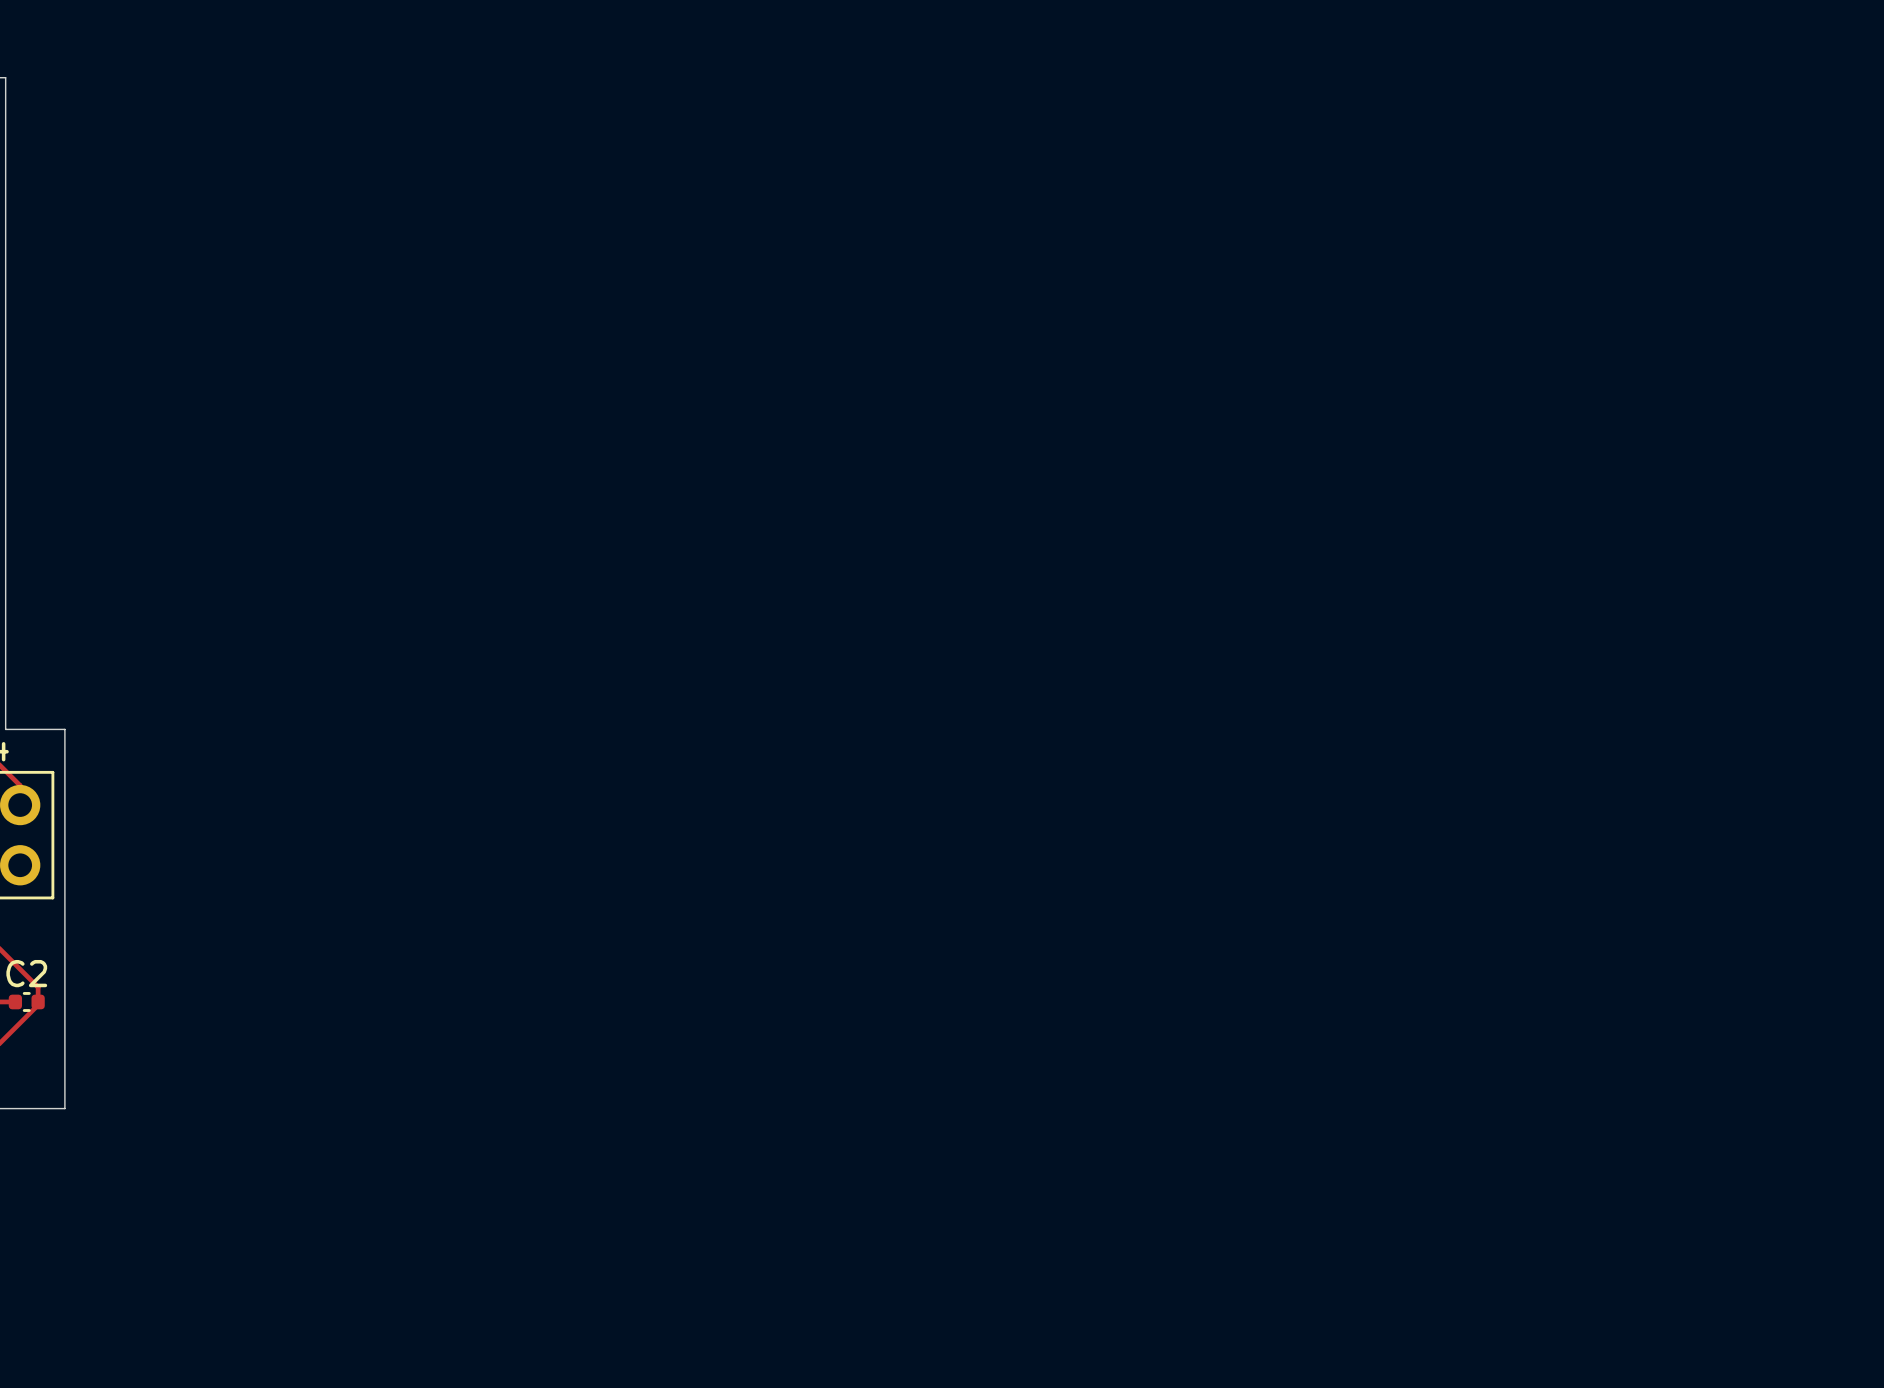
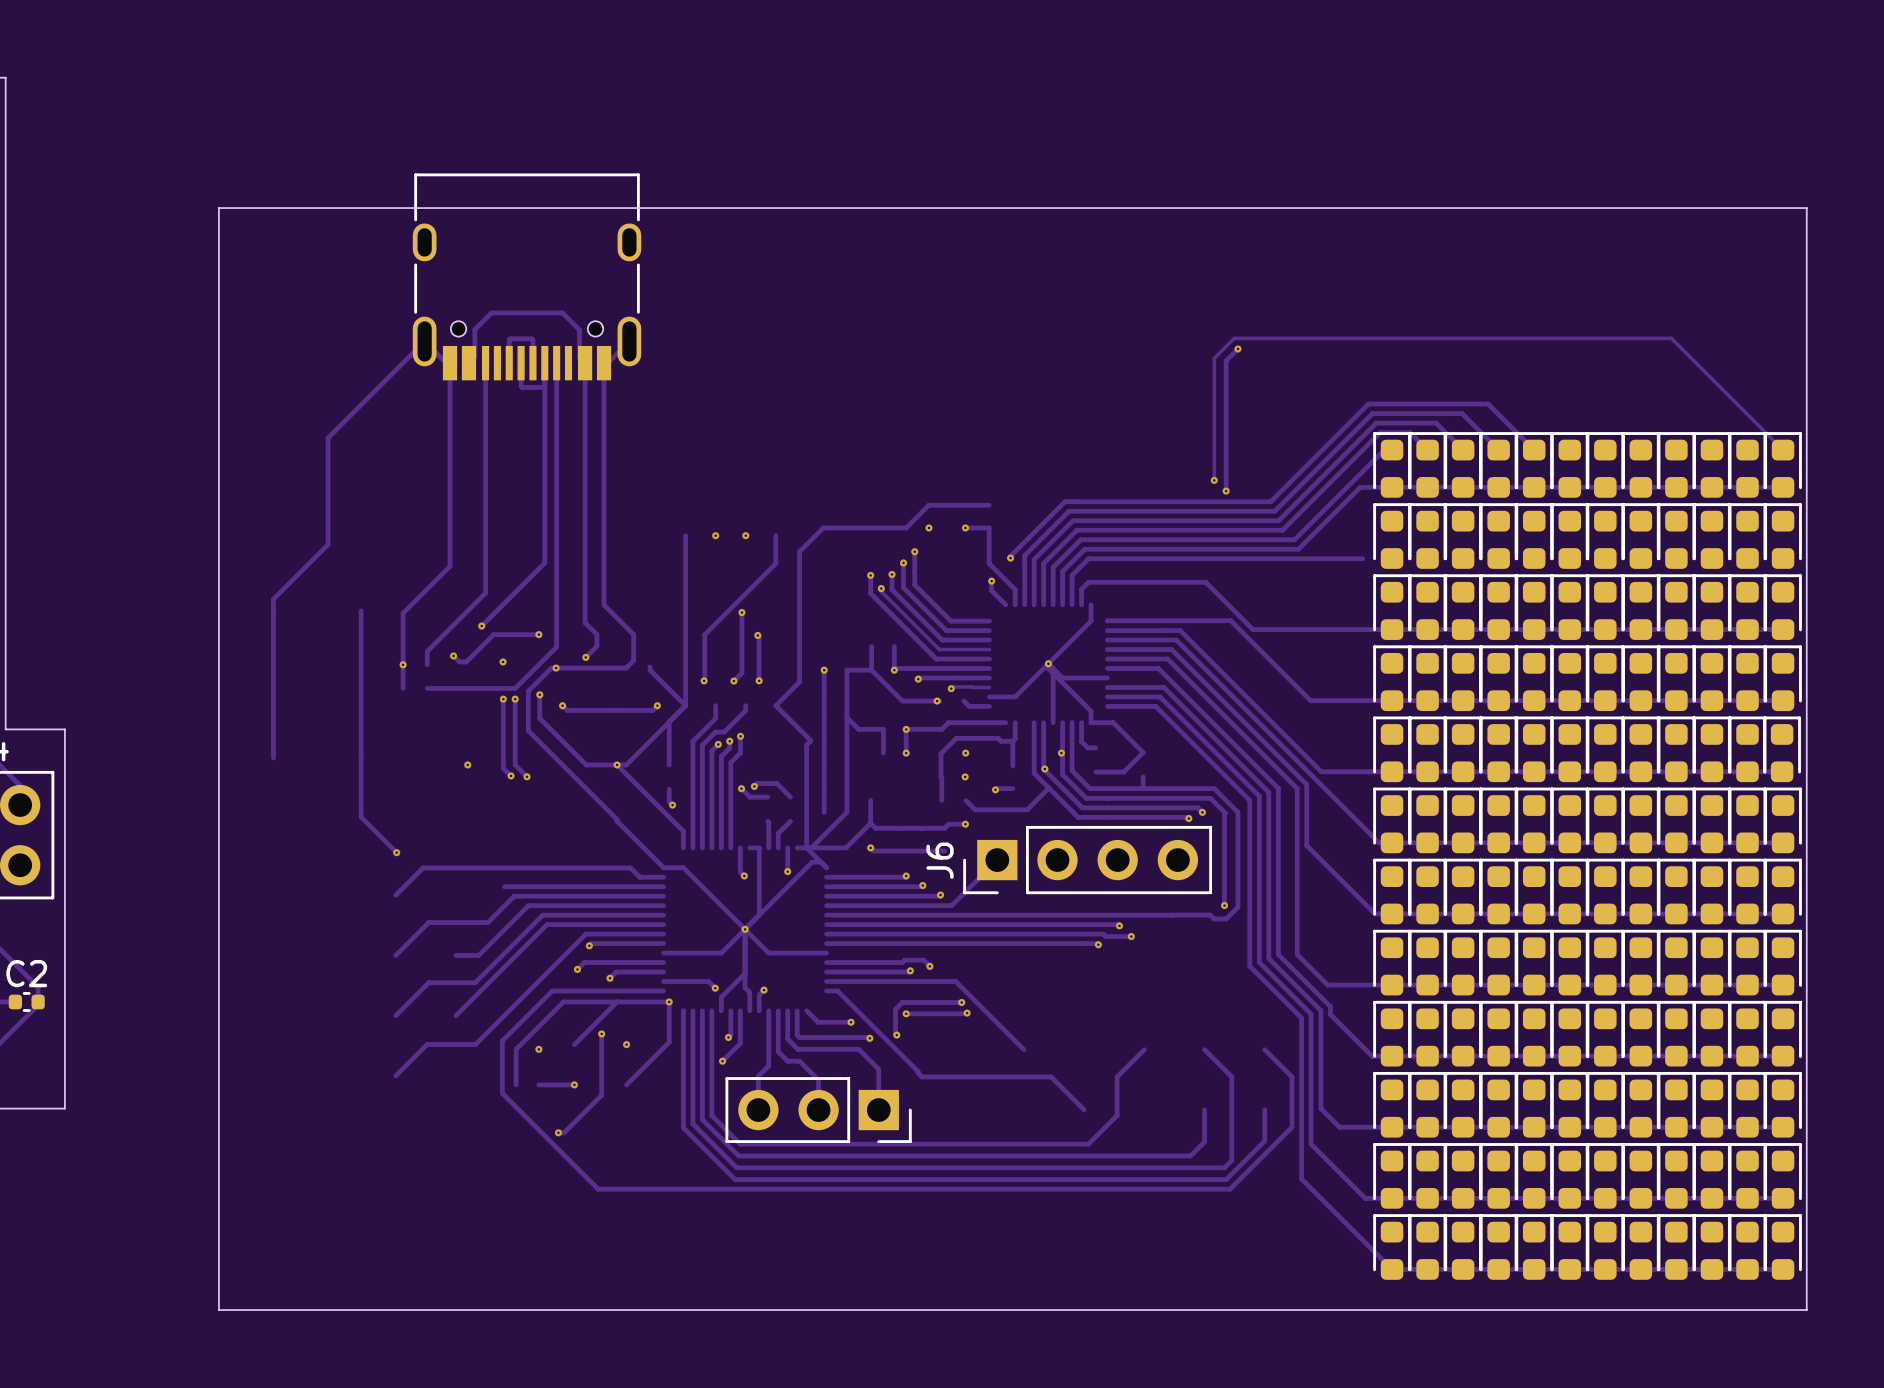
board edge: none -> (218, 208) (1806, 208) (1806, 1310) (218, 1310) (218, 208)
part: none -> (527, 276)
track: none -> (629, 341) (607, 363) (604, 363) (604, 605) (633, 634) (633, 660) (626, 668) (551, 668) (528, 691) (528, 730) (663, 867) (683, 867) (768, 953) (826, 953)
track: none -> (1237, 348) (1226, 360) (1226, 491)
via: none -> (1237, 348)
track: none -> (468, 363) (474, 357) (474, 329) (491, 312) (562, 312) (579, 329) (579, 357) (585, 363) (585, 622) (596, 634) (596, 646) (585, 657)
track: none -> (485, 363) (485, 593) (427, 651) (427, 664)
track: none -> (509, 363) (510, 338) (532, 340) (532, 363)
track: none -> (521, 363) (522, 387) (544, 386)
track: none -> (544, 363) (544, 562) (481, 626)
track: none -> (556, 363) (556, 646) (515, 688) (427, 688)
track: none -> (1392, 450) (1384, 450) (1294, 539) (1080, 539) (1053, 567) (1053, 604)
track: none -> (1427, 450) (1410, 432) (1380, 432) (1282, 530) (1076, 530) (1043, 563) (1043, 604)
track: none -> (1463, 450) (1436, 423) (1376, 423) (1278, 520) (1072, 520) (1034, 559) (1034, 604)
track: none -> (1498, 450) (1462, 413) (1372, 413) (1274, 511) (1069, 511) (1024, 555) (1024, 604)
track: none -> (1534, 450) (1488, 404) (1368, 404) (1270, 501) (1065, 501) (1010, 558)
track: none -> (1783, 450) (1671, 338) (1234, 338) (1214, 358) (1214, 480)
part: none -> (1392, 464)
part: none -> (1427, 464)
part: none -> (1463, 464)
part: none -> (1498, 464)
part: none -> (1534, 464)
part: none -> (1569, 464)
part: none -> (1605, 464)
part: none -> (1640, 464)
part: none -> (1676, 464)
part: none -> (1711, 464)
part: none -> (1747, 464)
part: none -> (1783, 464)
via: none -> (1214, 480)
track: none -> (1783, 487) (1360, 487) (1298, 549) (1084, 549) (1062, 571) (1062, 604)
via: none -> (1226, 491)
track: none -> (989, 505) (928, 505) (906, 527) (823, 527) (799, 551) (799, 682) (775, 705) (810, 740) (806, 745) (806, 847) (826, 867)
via: none -> (928, 527)
track: none -> (965, 527) (989, 527) (989, 563) (1015, 589) (1015, 604)
via: none -> (965, 527)
track: none -> (685, 535) (685, 705)
via: none -> (715, 535)
via: none -> (745, 535)
track: none -> (775, 535) (775, 563) (704, 634) (704, 680)
part: none -> (1392, 536)
part: none -> (1427, 536)
part: none -> (1463, 536)
part: none -> (1498, 536)
part: none -> (1534, 536)
part: none -> (1569, 536)
part: none -> (1605, 536)
part: none -> (1640, 536)
part: none -> (1676, 536)
part: none -> (1711, 536)
part: none -> (1747, 536)
part: none -> (1783, 536)
track: none -> (914, 551) (914, 584) (950, 621) (989, 621)
via: none -> (914, 551)
via: none -> (1010, 558)
track: none -> (1362, 558) (1088, 558) (1072, 575) (1072, 604)
track: none -> (903, 562) (903, 587) (946, 630) (989, 630)
via: none -> (903, 562)
track: none -> (892, 574) (892, 589) (942, 640) (989, 640)
via: none -> (892, 574)
track: none -> (870, 575) (870, 593) (936, 659) (989, 659)
via: none -> (870, 575)
track: none -> (991, 581) (991, 590) (1005, 604)
via: none -> (991, 581)
track: none -> (881, 588) (881, 591) (939, 649) (989, 649)
via: none -> (881, 588)
track: none -> (1081, 604) (1081, 589) (1088, 582) (1205, 582) (1253, 629) (1783, 629)
track: none -> (1091, 604) (1091, 621) (1015, 696) (989, 696)
part: none -> (1392, 607)
part: none -> (1427, 607)
part: none -> (1463, 607)
part: none -> (1498, 607)
part: none -> (1534, 607)
part: none -> (1569, 607)
part: none -> (1605, 607)
part: none -> (1640, 607)
part: none -> (1676, 607)
part: none -> (1711, 607)
part: none -> (1747, 607)
part: none -> (1783, 607)
track: none -> (361, 610) (361, 817) (396, 852)
track: none -> (741, 612) (741, 673) (733, 681)
via: none -> (741, 612)
track: none -> (1107, 621) (1230, 620) (1310, 700) (1783, 700)
via: none -> (481, 626)
track: none -> (1107, 630) (1180, 630) (1321, 771) (1782, 771)
track: none -> (538, 634) (493, 634) (466, 661) (459, 661) (453, 655)
via: none -> (538, 634)
track: none -> (757, 635) (759, 680)
via: none -> (757, 635)
track: none -> (1107, 640) (1176, 640) (1379, 842) (1783, 842)
track: none -> (871, 646) (871, 670)
track: none -> (894, 646) (894, 670) (896, 668) (989, 668)
track: none -> (1107, 649) (1171, 649) (1306, 784) (1306, 845) (1375, 913) (1783, 913)
via: none -> (453, 655)
via: none -> (585, 657)
track: none -> (1107, 659) (1167, 659) (1297, 788) (1297, 954) (1327, 985) (1783, 985)
via: none -> (503, 661)
via: none -> (1048, 663)
via: none -> (403, 664)
track: none -> (650, 666) (650, 670) (685, 705)
via: none -> (556, 668)
track: none -> (1053, 668) (1053, 722)
track: none -> (1107, 668) (1158, 668) (1278, 788) (1278, 954) (1330, 1006) (1330, 1014) (1372, 1056) (1783, 1056)
track: none -> (824, 670) (824, 812)
via: none -> (824, 670)
track: none -> (871, 670) (846, 670) (846, 812) (811, 847)
track: none -> (871, 670) (902, 701) (939, 701)
via: none -> (894, 670)
track: none -> (918, 677) (989, 677)
track: none -> (1107, 677) (1062, 677) (1048, 663) (1048, 668) (1091, 711) (1091, 722) (1113, 722) (1143, 752) (1123, 772) (1095, 772)
part: none -> (1392, 678)
part: none -> (1427, 678)
part: none -> (1463, 678)
part: none -> (1498, 678)
part: none -> (1534, 678)
part: none -> (1569, 678)
part: none -> (1605, 678)
part: none -> (1640, 678)
part: none -> (1676, 678)
part: none -> (1711, 678)
part: none -> (1747, 678)
part: none -> (1783, 678)
via: none -> (918, 679)
via: none -> (704, 680)
via: none -> (759, 680)
via: none -> (733, 681)
track: none -> (989, 687) (952, 686) (951, 688)
track: none -> (1107, 687) (1163, 687) (1268, 792) (1268, 958) (1320, 1010) (1320, 1108) (1339, 1127) (1783, 1127)
track: none -> (403, 688) (403, 613) (450, 566) (450, 363) (446, 363) (424, 341) (328, 438) (328, 544) (273, 599) (273, 757)
via: none -> (951, 688)
track: none -> (539, 694) (539, 718) (586, 764) (626, 764) (685, 705)
via: none -> (539, 694)
track: none -> (1107, 696) (1160, 696) (1259, 796) (1259, 962) (1311, 1014) (1311, 1144) (1365, 1198) (1783, 1198)
track: none -> (503, 699) (503, 768) (511, 775)
via: none -> (503, 699)
track: none -> (515, 699) (515, 764) (527, 776)
via: none -> (515, 699)
via: none -> (937, 701)
track: none -> (963, 701) (969, 706) (989, 706)
track: none -> (562, 705) (567, 710) (652, 710) (657, 705)
via: none -> (562, 705)
via: none -> (657, 705)
track: none -> (715, 705) (715, 718) (692, 741) (692, 847)
track: none -> (745, 705) (745, 710) (724, 732) (715, 732) (702, 745) (702, 847)
track: none -> (1107, 706) (1155, 706) (1249, 800) (1249, 966) (1301, 1018) (1301, 1178) (1392, 1269) (1783, 1269)
track: none -> (846, 717) (858, 729) (883, 729) (883, 753)
track: none -> (669, 722) (669, 764)
track: none -> (1005, 722) (948, 722) (941, 729) (906, 729) (906, 753)
track: none -> (1015, 722) (1015, 738) (1012, 741)
track: none -> (1034, 722) (1034, 773) (1078, 817) (1188, 818)
track: none -> (1043, 722) (1043, 769)
track: none -> (1062, 722) (1062, 774) (1086, 798) (1210, 798) (1225, 813) (1224, 905)
track: none -> (1072, 722) (1072, 770) (1090, 788) (1214, 788) (1237, 812) (1237, 907) (1226, 919) (1214, 919) (1210, 915) (1173, 915)
track: none -> (1081, 722) (1081, 741) (1087, 747) (1095, 747)
via: none -> (906, 729)
track: none -> (740, 736) (740, 752) (730, 762) (730, 847)
via: none -> (740, 736)
track: none -> (729, 741) (729, 748) (721, 756) (721, 847)
via: none -> (729, 741)
track: none -> (1012, 741) (1001, 741) (998, 738) (956, 738) (941, 753) (941, 800)
track: none -> (1012, 741) (1012, 765)
track: none -> (718, 744) (711, 750) (711, 847)
via: none -> (718, 744)
part: none -> (1392, 749)
part: none -> (1427, 749)
part: none -> (1463, 749)
part: none -> (1498, 749)
part: none -> (1534, 749)
part: none -> (1569, 749)
part: none -> (1605, 749)
part: none -> (1640, 749)
part: none -> (1676, 749)
part: none -> (1711, 749)
part: none -> (1747, 749)
part: none -> (1782, 749)
via: none -> (906, 753)
via: none -> (965, 753)
via: none -> (1061, 753)
via: none -> (467, 764)
track: none -> (617, 764) (683, 831) (683, 847)
via: none -> (617, 764)
track: none -> (1043, 769) (1082, 807) (1197, 807) (1202, 812)
via: none -> (1044, 769)
via: none -> (511, 775)
via: none -> (527, 776)
via: none -> (965, 776)
track: none -> (1143, 776) (1143, 788)
track: none -> (754, 786) (757, 783) (776, 783) (790, 797)
via: none -> (754, 786)
track: none -> (741, 788) (749, 797) (767, 797)
via: none -> (741, 788)
track: none -> (1012, 788) (995, 789)
track: none -> (1048, 788) (1027, 809) (975, 809) (965, 800)
track: none -> (669, 789) (669, 801) (672, 805)
via: none -> (995, 789)
track: none -> (870, 800) (870, 823)
via: none -> (672, 805)
via: none -> (1202, 812)
via: none -> (1188, 818)
part: none -> (1392, 820)
part: none -> (1427, 820)
part: none -> (1463, 820)
part: none -> (1498, 820)
part: none -> (1534, 820)
part: none -> (1569, 820)
part: none -> (1605, 820)
part: none -> (1640, 820)
part: none -> (1676, 820)
part: none -> (1711, 820)
part: none -> (1747, 820)
part: none -> (1783, 820)
track: none -> (767, 821) (768, 847)
track: none -> (790, 821) (778, 833) (778, 847)
track: none -> (870, 823) (875, 828) (944, 828) (948, 824) (965, 824)
track: none -> (870, 823) (846, 847) (797, 847)
via: none -> (965, 824)
track: none -> (740, 847) (740, 871) (744, 875)
track: none -> (749, 847) (759, 847) (759, 915)
track: none -> (787, 847) (787, 871)
track: none -> (870, 847) (873, 851) (944, 851)
via: none -> (870, 847)
via: none -> (396, 852)
track: none -> (997, 860) (951, 905) (826, 905)
J6: none -> (1087, 860)
track: none -> (820, 862) (812, 862) (721, 953) (663, 953)
via: none -> (787, 871)
via: none -> (744, 875)
track: none -> (906, 876) (826, 877)
via: none -> (906, 876)
track: none -> (663, 877) (639, 877) (630, 868) (423, 868) (395, 895)
track: none -> (922, 885) (826, 886)
via: none -> (922, 885)
track: none -> (504, 886) (663, 886)
part: none -> (1392, 891)
part: none -> (1427, 891)
part: none -> (1463, 891)
part: none -> (1498, 891)
part: none -> (1534, 891)
part: none -> (1569, 891)
part: none -> (1605, 891)
part: none -> (1640, 891)
part: none -> (1676, 891)
part: none -> (1711, 891)
part: none -> (1747, 891)
part: none -> (1783, 891)
track: none -> (940, 895) (826, 896)
via: none -> (940, 895)
track: none -> (663, 896) (514, 896) (487, 922) (428, 922) (395, 955)
track: none -> (663, 905) (528, 905) (478, 955) (455, 955)
via: none -> (1224, 905)
track: none -> (663, 915) (542, 915) (475, 982) (428, 982) (395, 1015)
track: none -> (826, 915) (1172, 915)
track: none -> (663, 924) (547, 924) (455, 1015)
track: none -> (826, 924) (1119, 925)
via: none -> (1119, 925)
track: none -> (745, 929) (745, 987) (749, 992) (749, 1010)
via: none -> (745, 929)
track: none -> (663, 934) (585, 934) (475, 1044) (427, 1044) (395, 1075)
track: none -> (826, 934) (1103, 934) (1105, 936) (1131, 936)
via: none -> (1131, 936)
track: none -> (663, 943) (591, 943) (589, 945)
track: none -> (826, 943) (1098, 944)
via: none -> (1098, 944)
via: none -> (589, 945)
track: none -> (663, 962) (584, 962) (577, 969)
track: none -> (826, 962) (902, 962) (904, 960) (923, 960) (929, 966)
part: none -> (1392, 962)
part: none -> (1427, 962)
part: none -> (1463, 962)
part: none -> (1498, 962)
part: none -> (1534, 962)
part: none -> (1569, 962)
part: none -> (1605, 962)
part: none -> (1640, 962)
part: none -> (1676, 962)
part: none -> (1711, 962)
part: none -> (1747, 962)
part: none -> (1783, 962)
via: none -> (929, 966)
via: none -> (577, 969)
track: none -> (910, 970) (826, 972)
via: none -> (910, 970)
track: none -> (663, 972) (616, 972) (609, 978)
track: none -> (745, 973) (721, 997) (721, 1010)
via: none -> (609, 978)
track: none -> (663, 981) (708, 981) (715, 988)
track: none -> (826, 981) (955, 981) (1023, 1049)
via: none -> (715, 988)
track: none -> (663, 990) (552, 990) (502, 1040) (502, 1093) (598, 1189) (1230, 1189) (1292, 1127) (1292, 1076) (1264, 1049)
track: none -> (764, 990) (759, 994) (759, 1010)
via: none -> (764, 990)
track: none -> (826, 990) (837, 990) (921, 1076) (1051, 1076) (1084, 1109)
track: none -> (617, 1001) (574, 1044)
via: none -> (669, 1001)
track: none -> (961, 1002) (902, 1002) (895, 1009) (896, 1035)
via: none -> (961, 1002)
track: none -> (683, 1010) (683, 1127) (735, 1179) (1226, 1179) (1264, 1141) (1264, 1109)
track: none -> (692, 1010) (692, 1123) (736, 1167) (1224, 1167) (1231, 1160) (1231, 1076) (1204, 1049)
track: none -> (702, 1010) (702, 1119) (738, 1155) (1190, 1155) (1204, 1142) (1204, 1109)
track: none -> (711, 1010) (711, 1115) (740, 1144) (1088, 1144) (1117, 1115) (1117, 1076) (1144, 1049)
track: none -> (730, 1010) (730, 1035) (728, 1037)
track: none -> (740, 1010) (740, 1043) (722, 1061)
track: none -> (768, 1010) (768, 1065) (758, 1076) (758, 1110)
track: none -> (778, 1010) (778, 1051) (787, 1061) (799, 1061) (818, 1080) (818, 1110)
track: none -> (787, 1010) (787, 1039) (797, 1049) (858, 1049) (878, 1069) (878, 1110)
track: none -> (797, 1010) (797, 1035) (799, 1037) (869, 1038)
track: none -> (806, 1010) (818, 1022) (851, 1022)
via: none -> (906, 1013)
track: none -> (967, 1013) (906, 1013)
via: none -> (967, 1013)
via: none -> (851, 1022)
track: none -> (601, 1033) (601, 1095) (564, 1132) (558, 1132)
via: none -> (601, 1033)
part: none -> (1392, 1033)
part: none -> (1427, 1033)
part: none -> (1463, 1033)
part: none -> (1498, 1033)
part: none -> (1534, 1033)
part: none -> (1569, 1033)
part: none -> (1605, 1033)
part: none -> (1640, 1033)
part: none -> (1676, 1033)
part: none -> (1711, 1033)
part: none -> (1747, 1033)
part: none -> (1783, 1033)
via: none -> (896, 1035)
via: none -> (728, 1037)
via: none -> (869, 1038)
via: none -> (626, 1044)
via: none -> (538, 1049)
via: none -> (722, 1061)
track: none -> (516, 1084) (516, 1049) (563, 1001) (669, 1001) (669, 1042) (626, 1084)
track: none -> (538, 1084) (574, 1084)
via: none -> (574, 1084)
part: none -> (1392, 1104)
part: none -> (1427, 1104)
part: none -> (1463, 1104)
part: none -> (1498, 1104)
part: none -> (1534, 1104)
part: none -> (1569, 1104)
part: none -> (1605, 1104)
part: none -> (1640, 1104)
part: none -> (1676, 1104)
part: none -> (1711, 1104)
part: none -> (1747, 1104)
part: none -> (1783, 1104)
part: none -> (818, 1110)
via: none -> (558, 1132)
part: none -> (1392, 1175)
part: none -> (1427, 1175)
part: none -> (1463, 1175)
part: none -> (1498, 1175)
part: none -> (1534, 1175)
part: none -> (1569, 1175)
part: none -> (1605, 1175)
part: none -> (1640, 1175)
part: none -> (1676, 1175)
part: none -> (1711, 1175)
part: none -> (1747, 1175)
part: none -> (1783, 1175)
part: none -> (1392, 1246)
part: none -> (1427, 1246)
part: none -> (1463, 1246)
part: none -> (1498, 1246)
part: none -> (1534, 1246)
part: none -> (1569, 1246)
part: none -> (1605, 1246)
part: none -> (1640, 1246)
part: none -> (1676, 1246)
part: none -> (1711, 1246)
part: none -> (1747, 1246)
part: none -> (1783, 1246)

